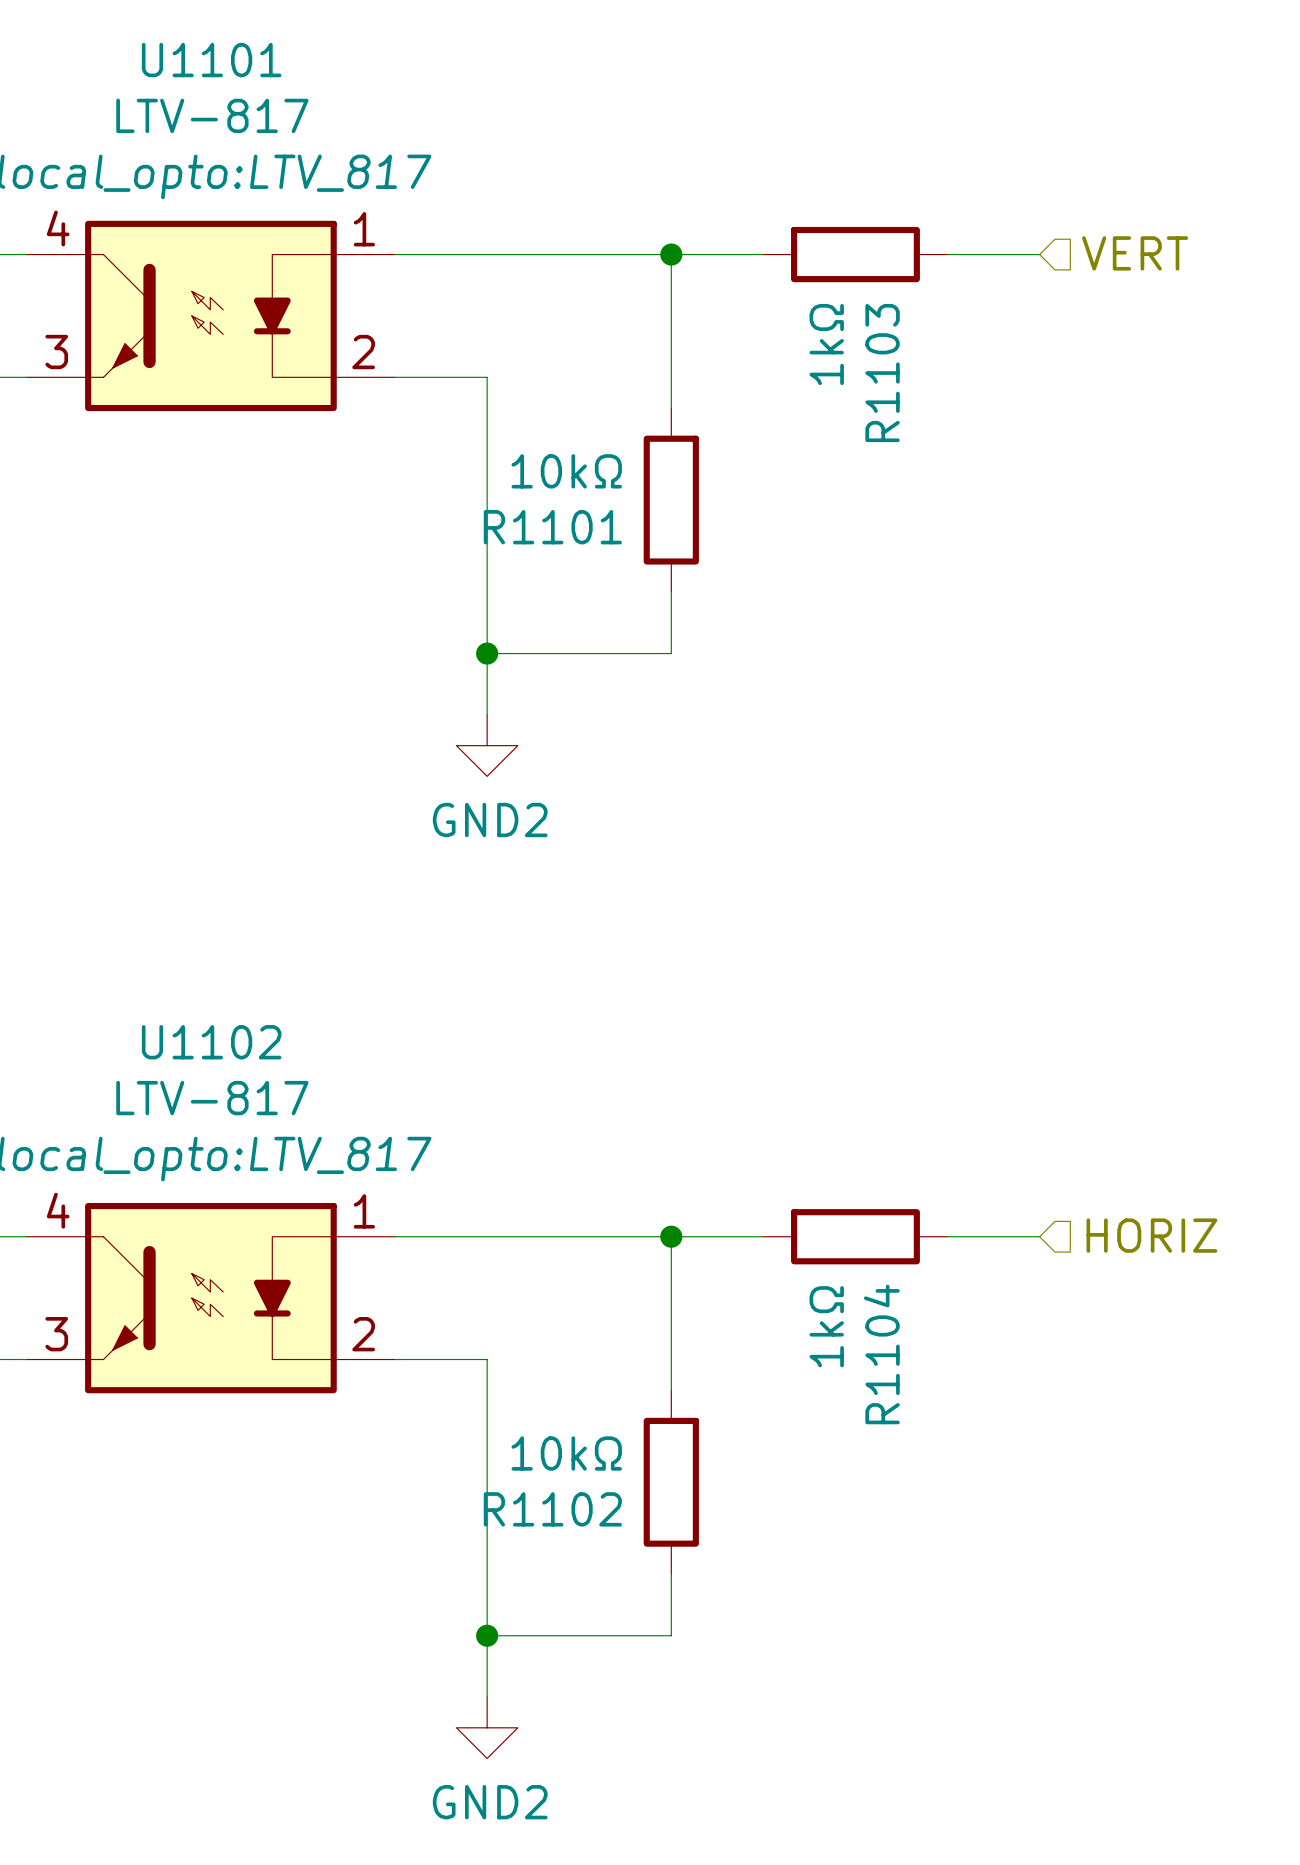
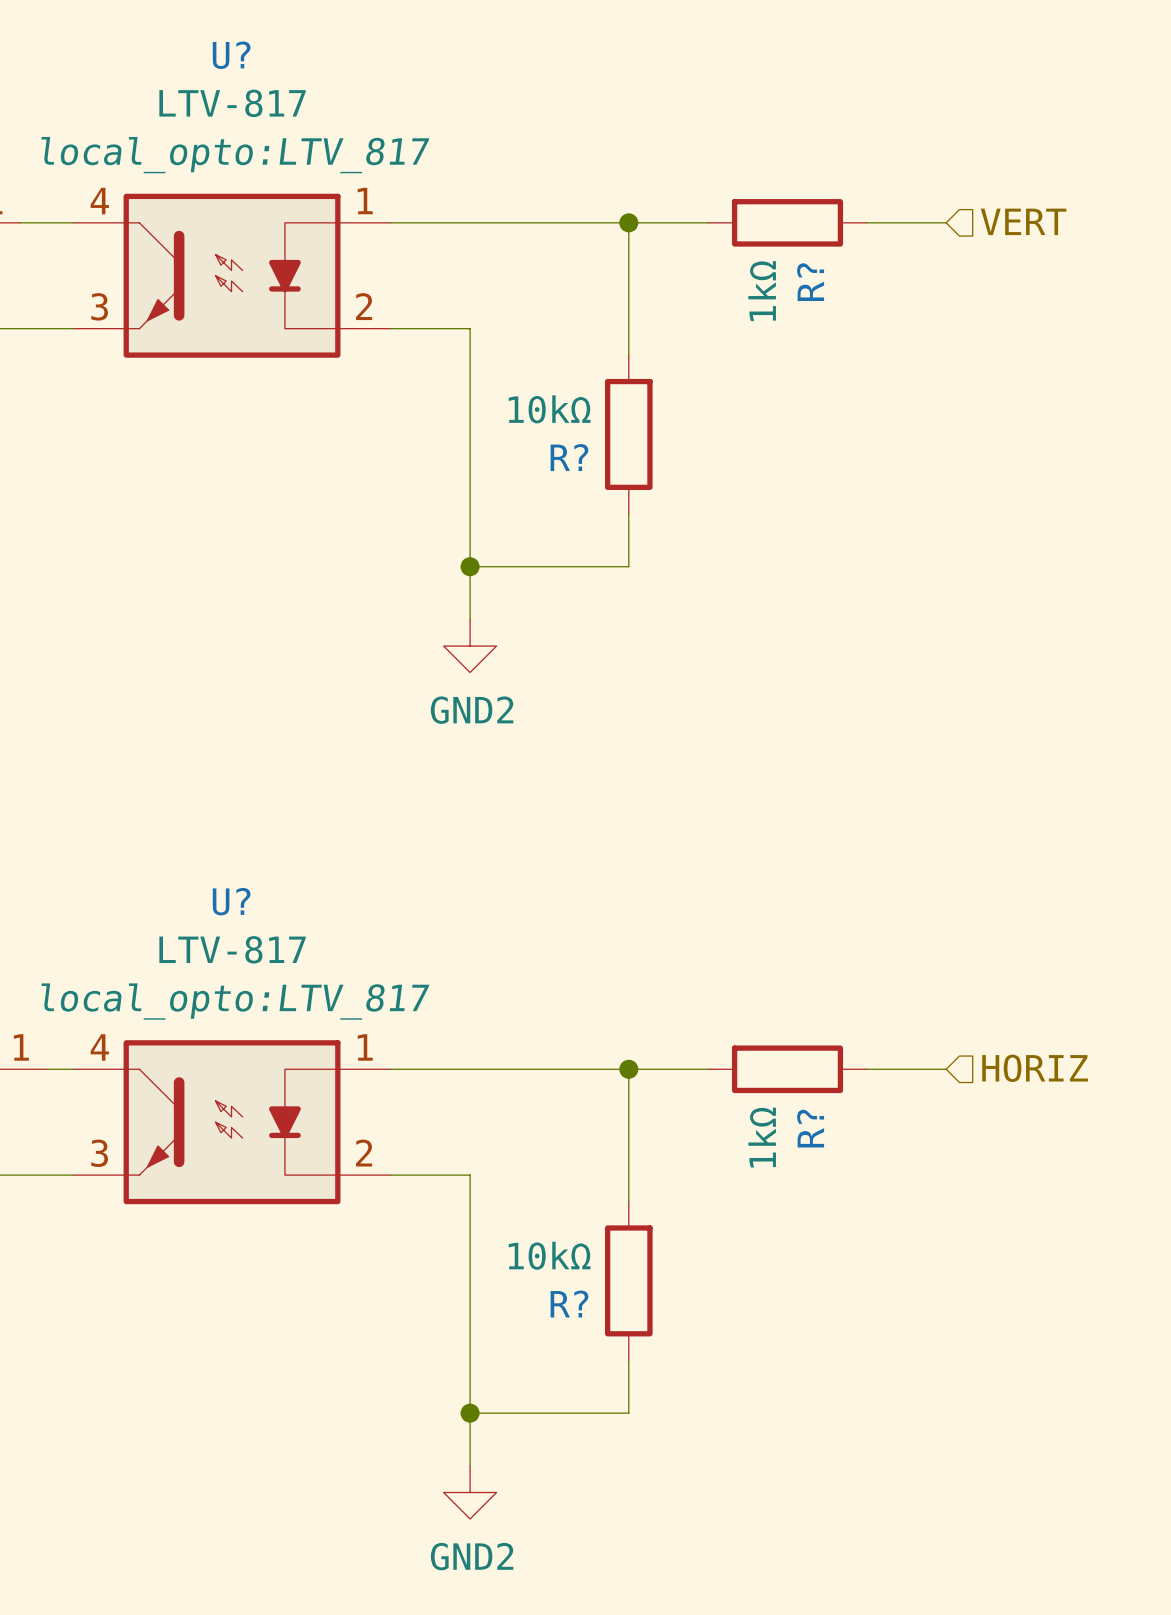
U1101 name: U1101 (211, 60) -> U? (231, 55)
R1103 name: R1103 (882, 373) -> R? (810, 282)
R1101 name: R1101 (552, 527) -> R? (569, 457)
U1102 name: U1102 (211, 1042) -> U? (231, 901)
R1104 name: R1104 (881, 1354) -> R? (810, 1128)
R1102 name: R1102 (552, 1509) -> R? (569, 1304)

